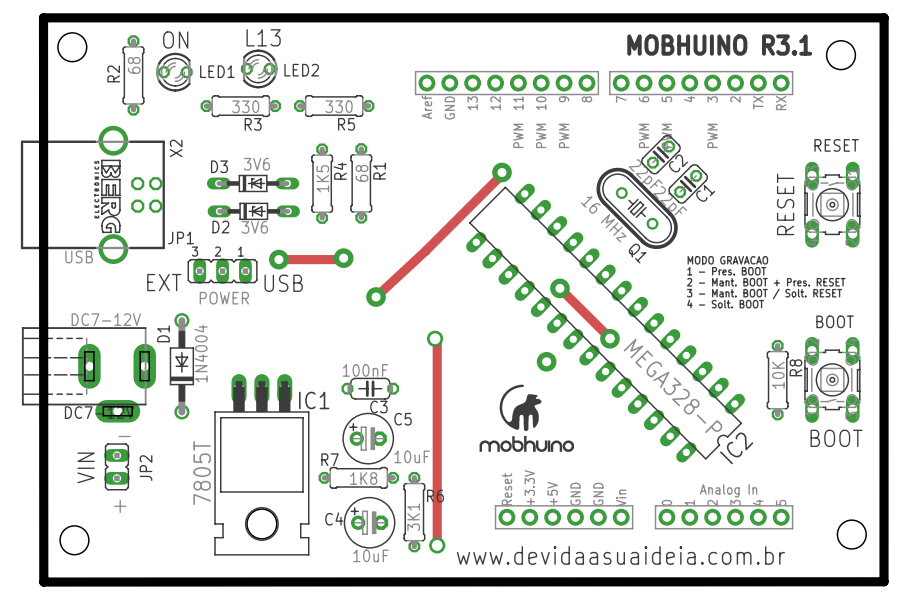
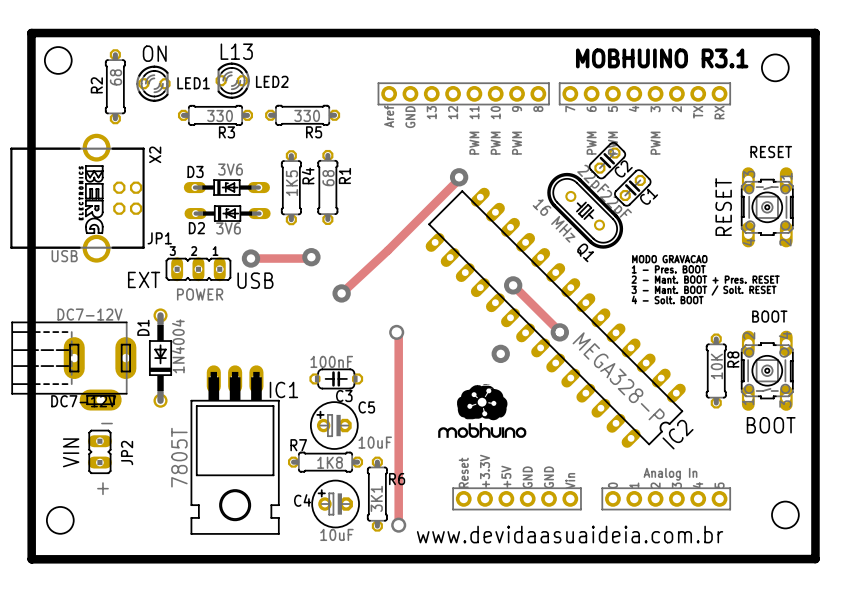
drawing: [499, 384, 542, 432] -> none
drawing: none -> [457, 384, 508, 421]

